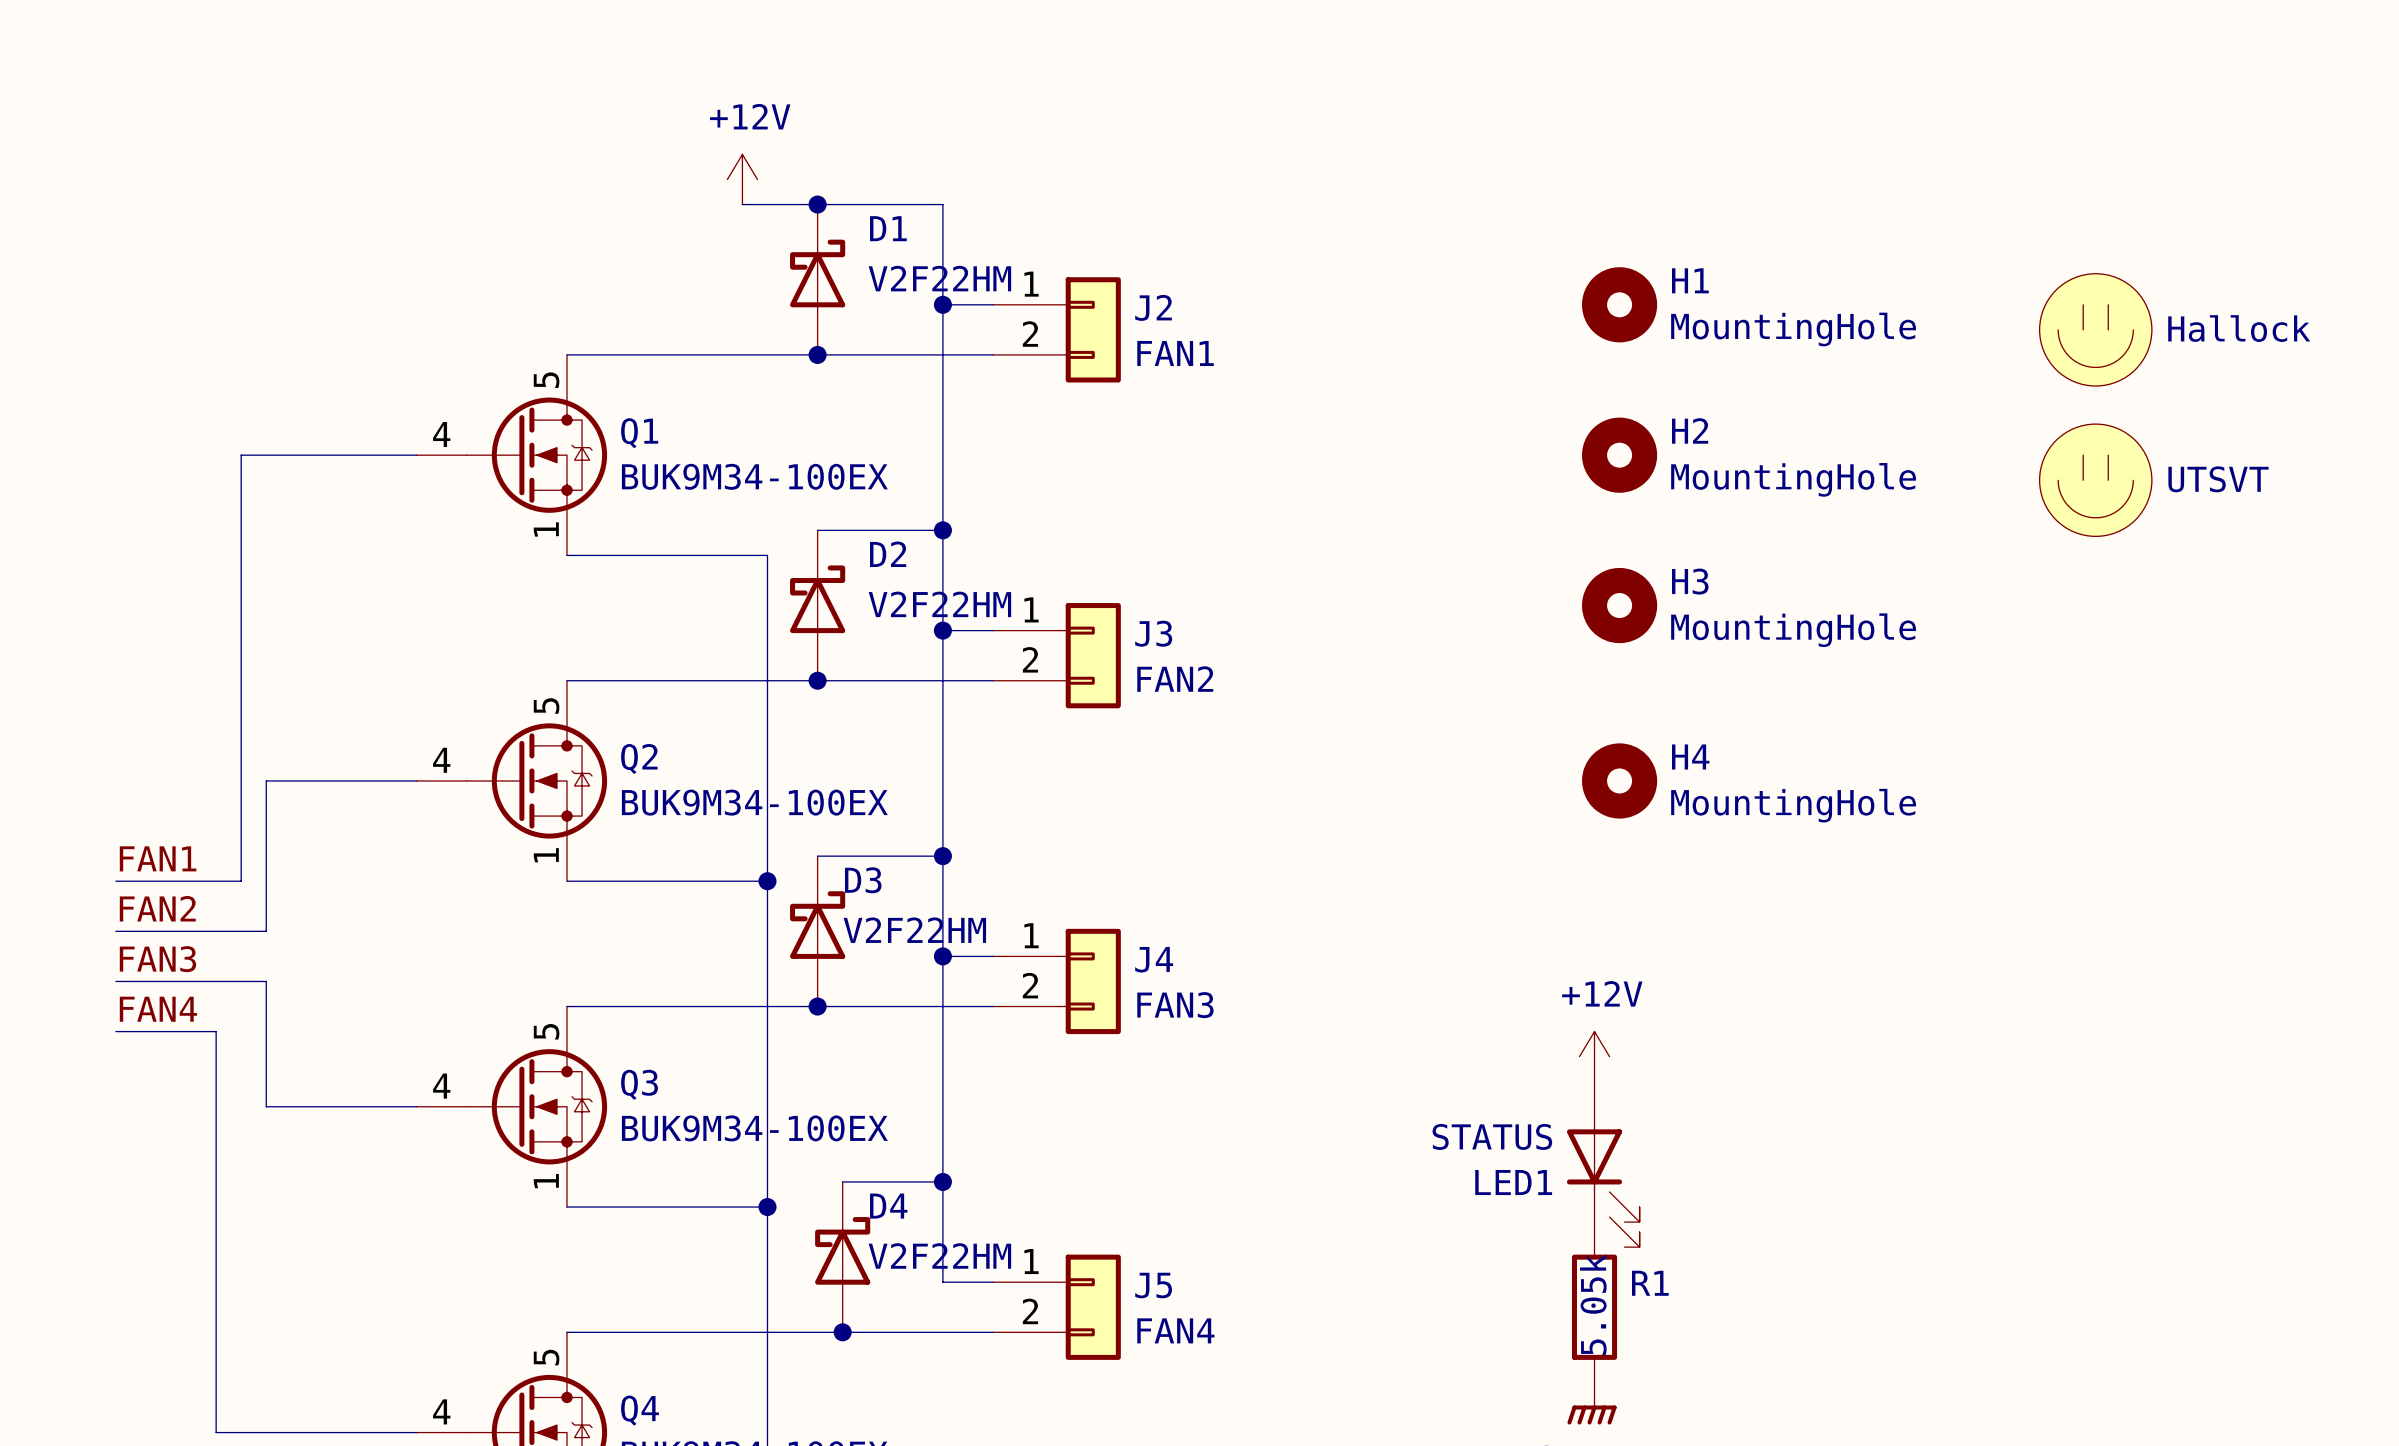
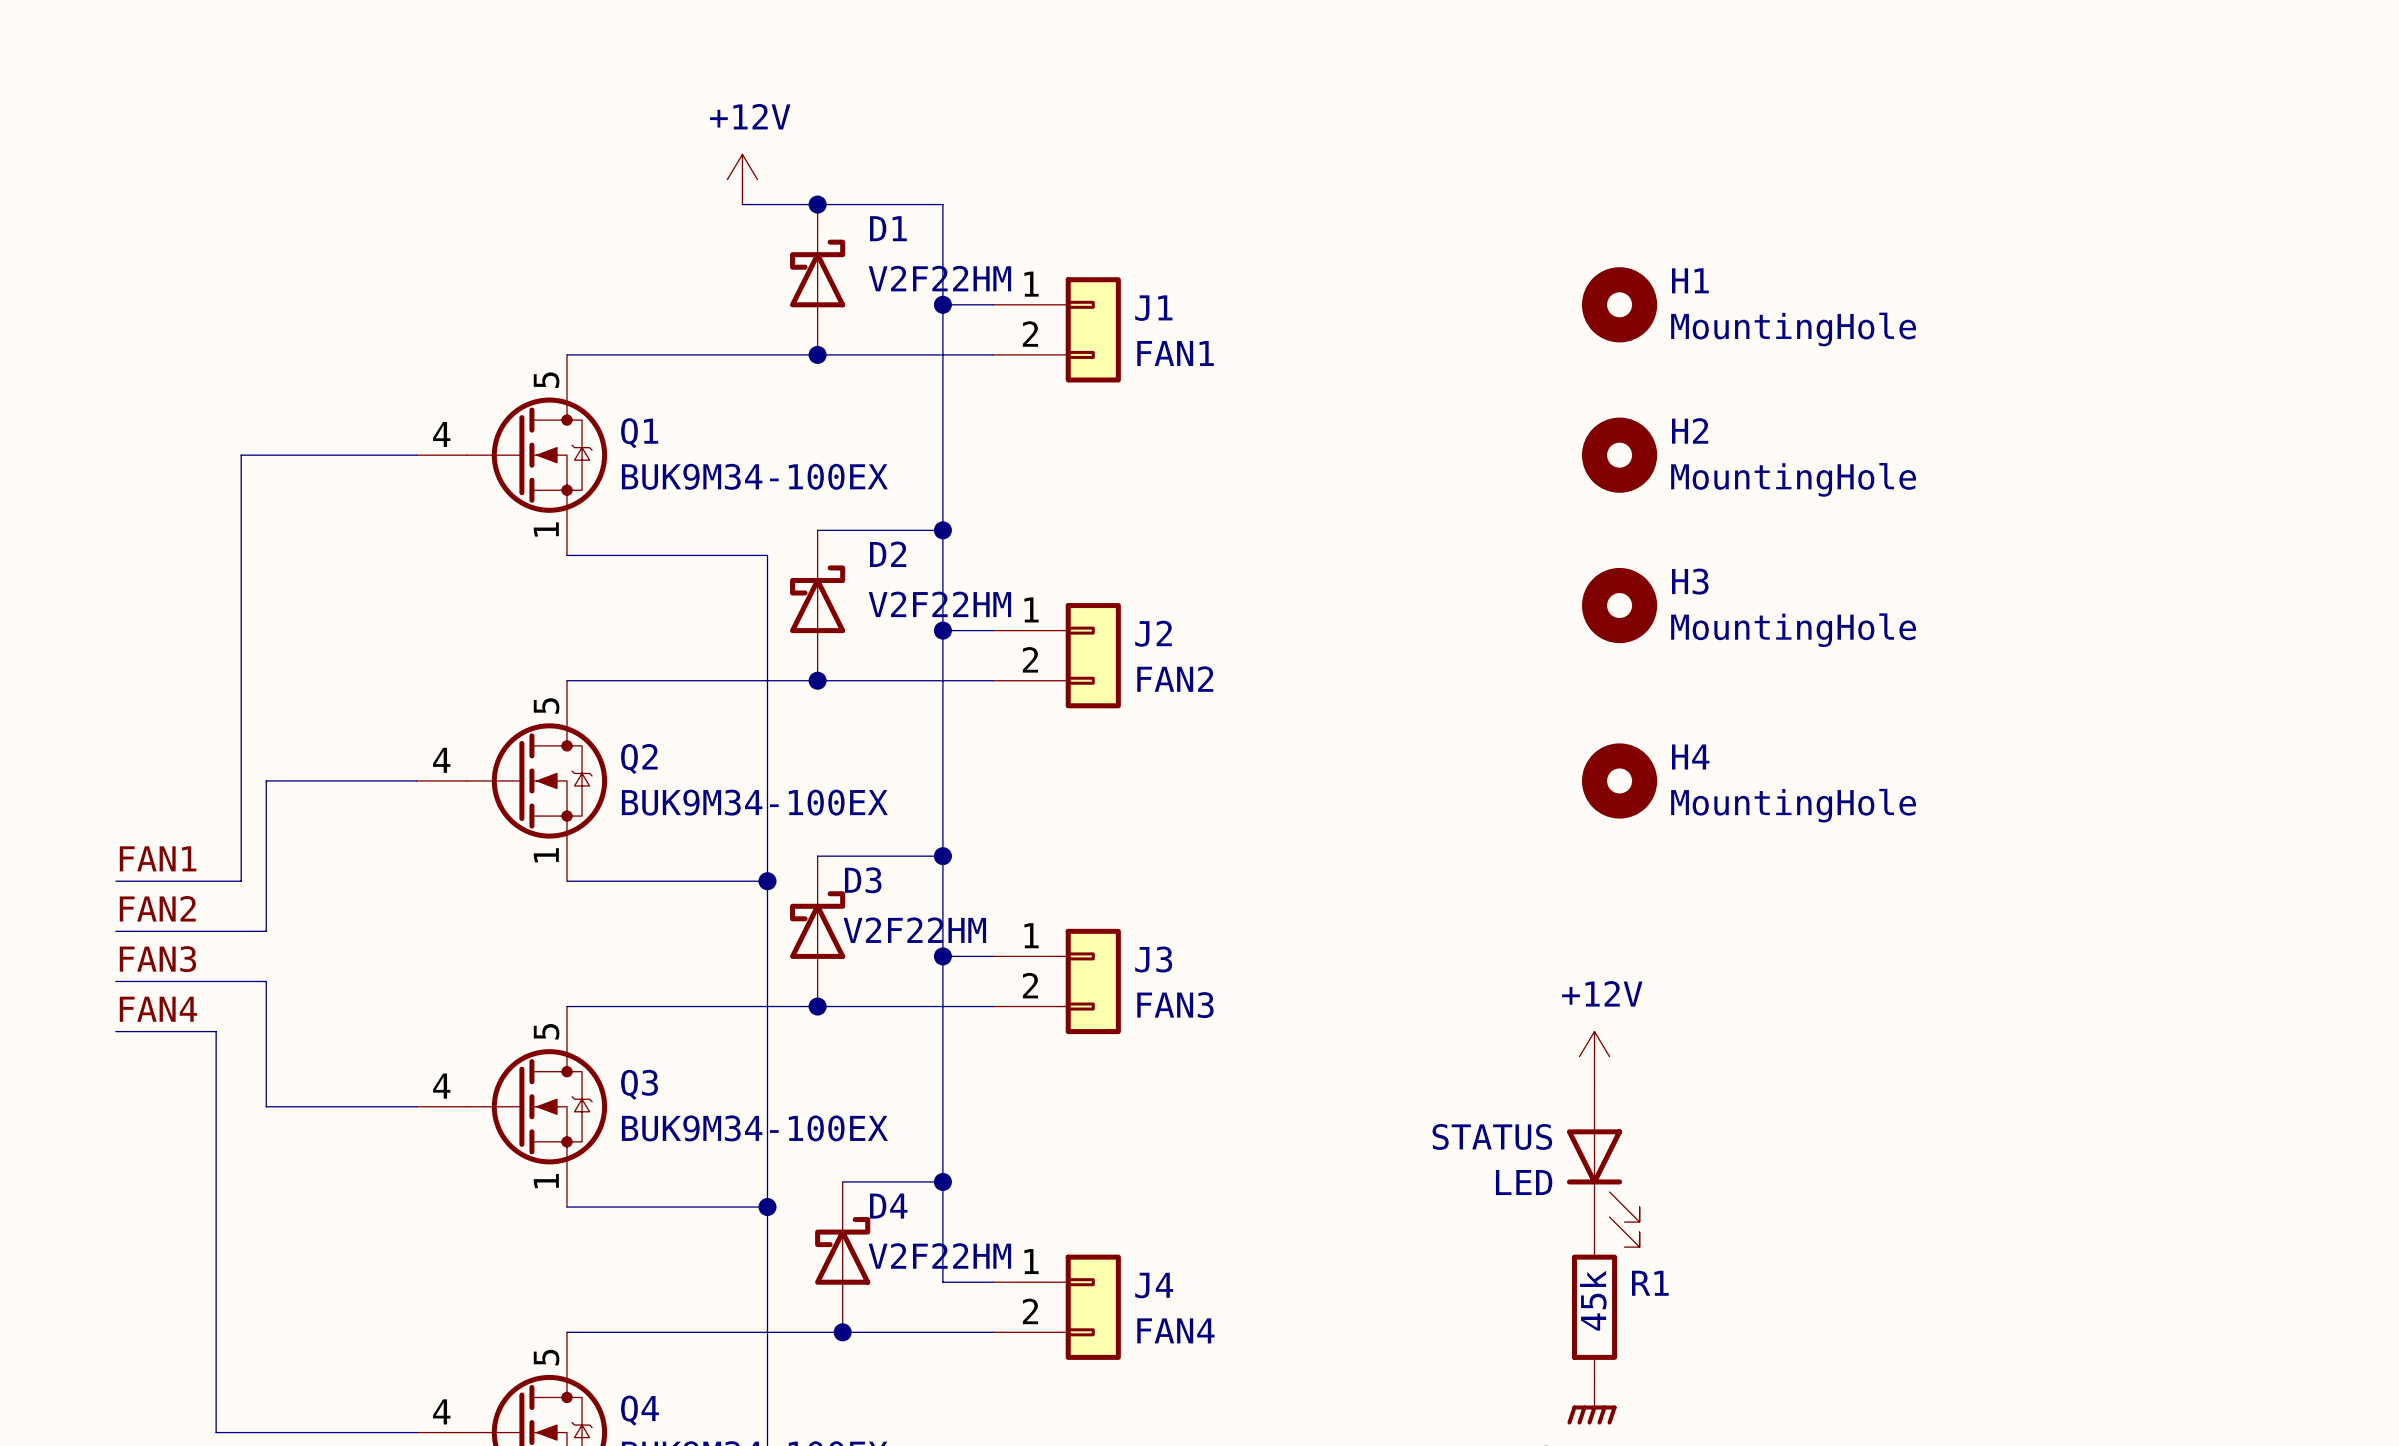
J2 name: J2 (1153, 307) -> J1 (1153, 308)
part: Hallock (2095, 329) -> none
part: UTSVT (2095, 480) -> none
J3 name: J3 (1153, 633) -> J2 (1153, 633)
J4 name: J4 (1154, 959) -> J3 (1153, 959)
LED1 name: LED1 (1513, 1182) -> LED (1524, 1182)
J5 name: J5 (1153, 1285) -> J4 (1154, 1285)
R1 value: 5.05k (1593, 1304) -> 45k (1593, 1300)

